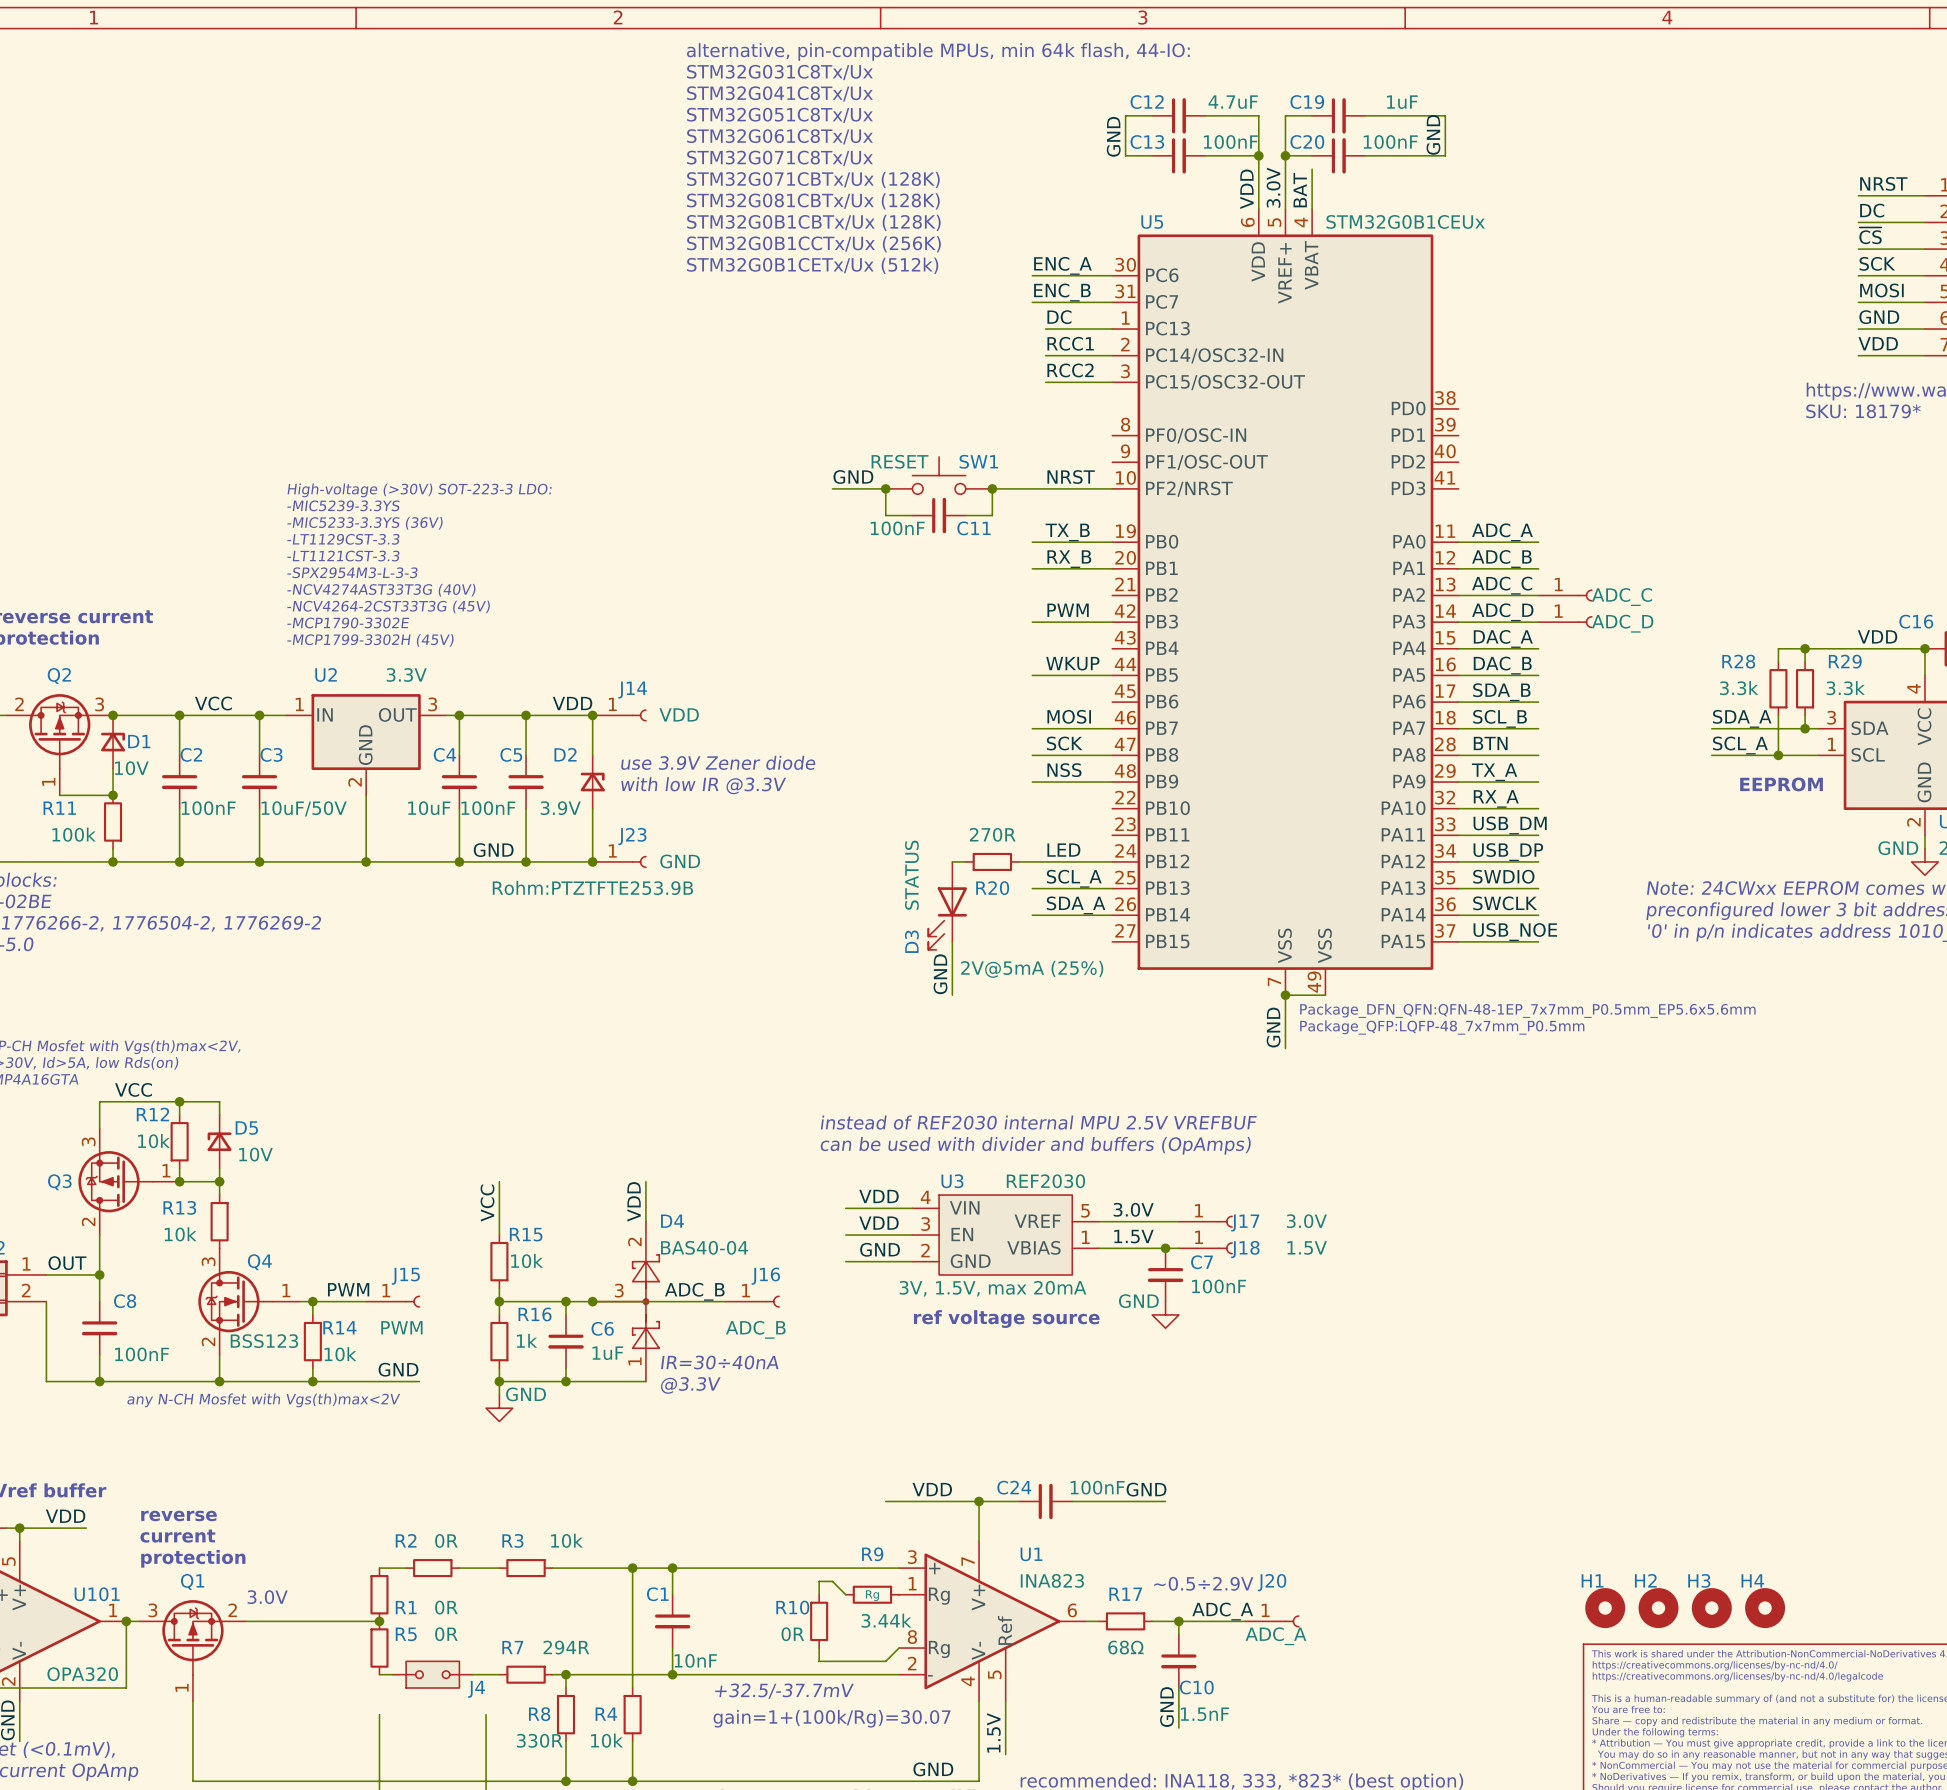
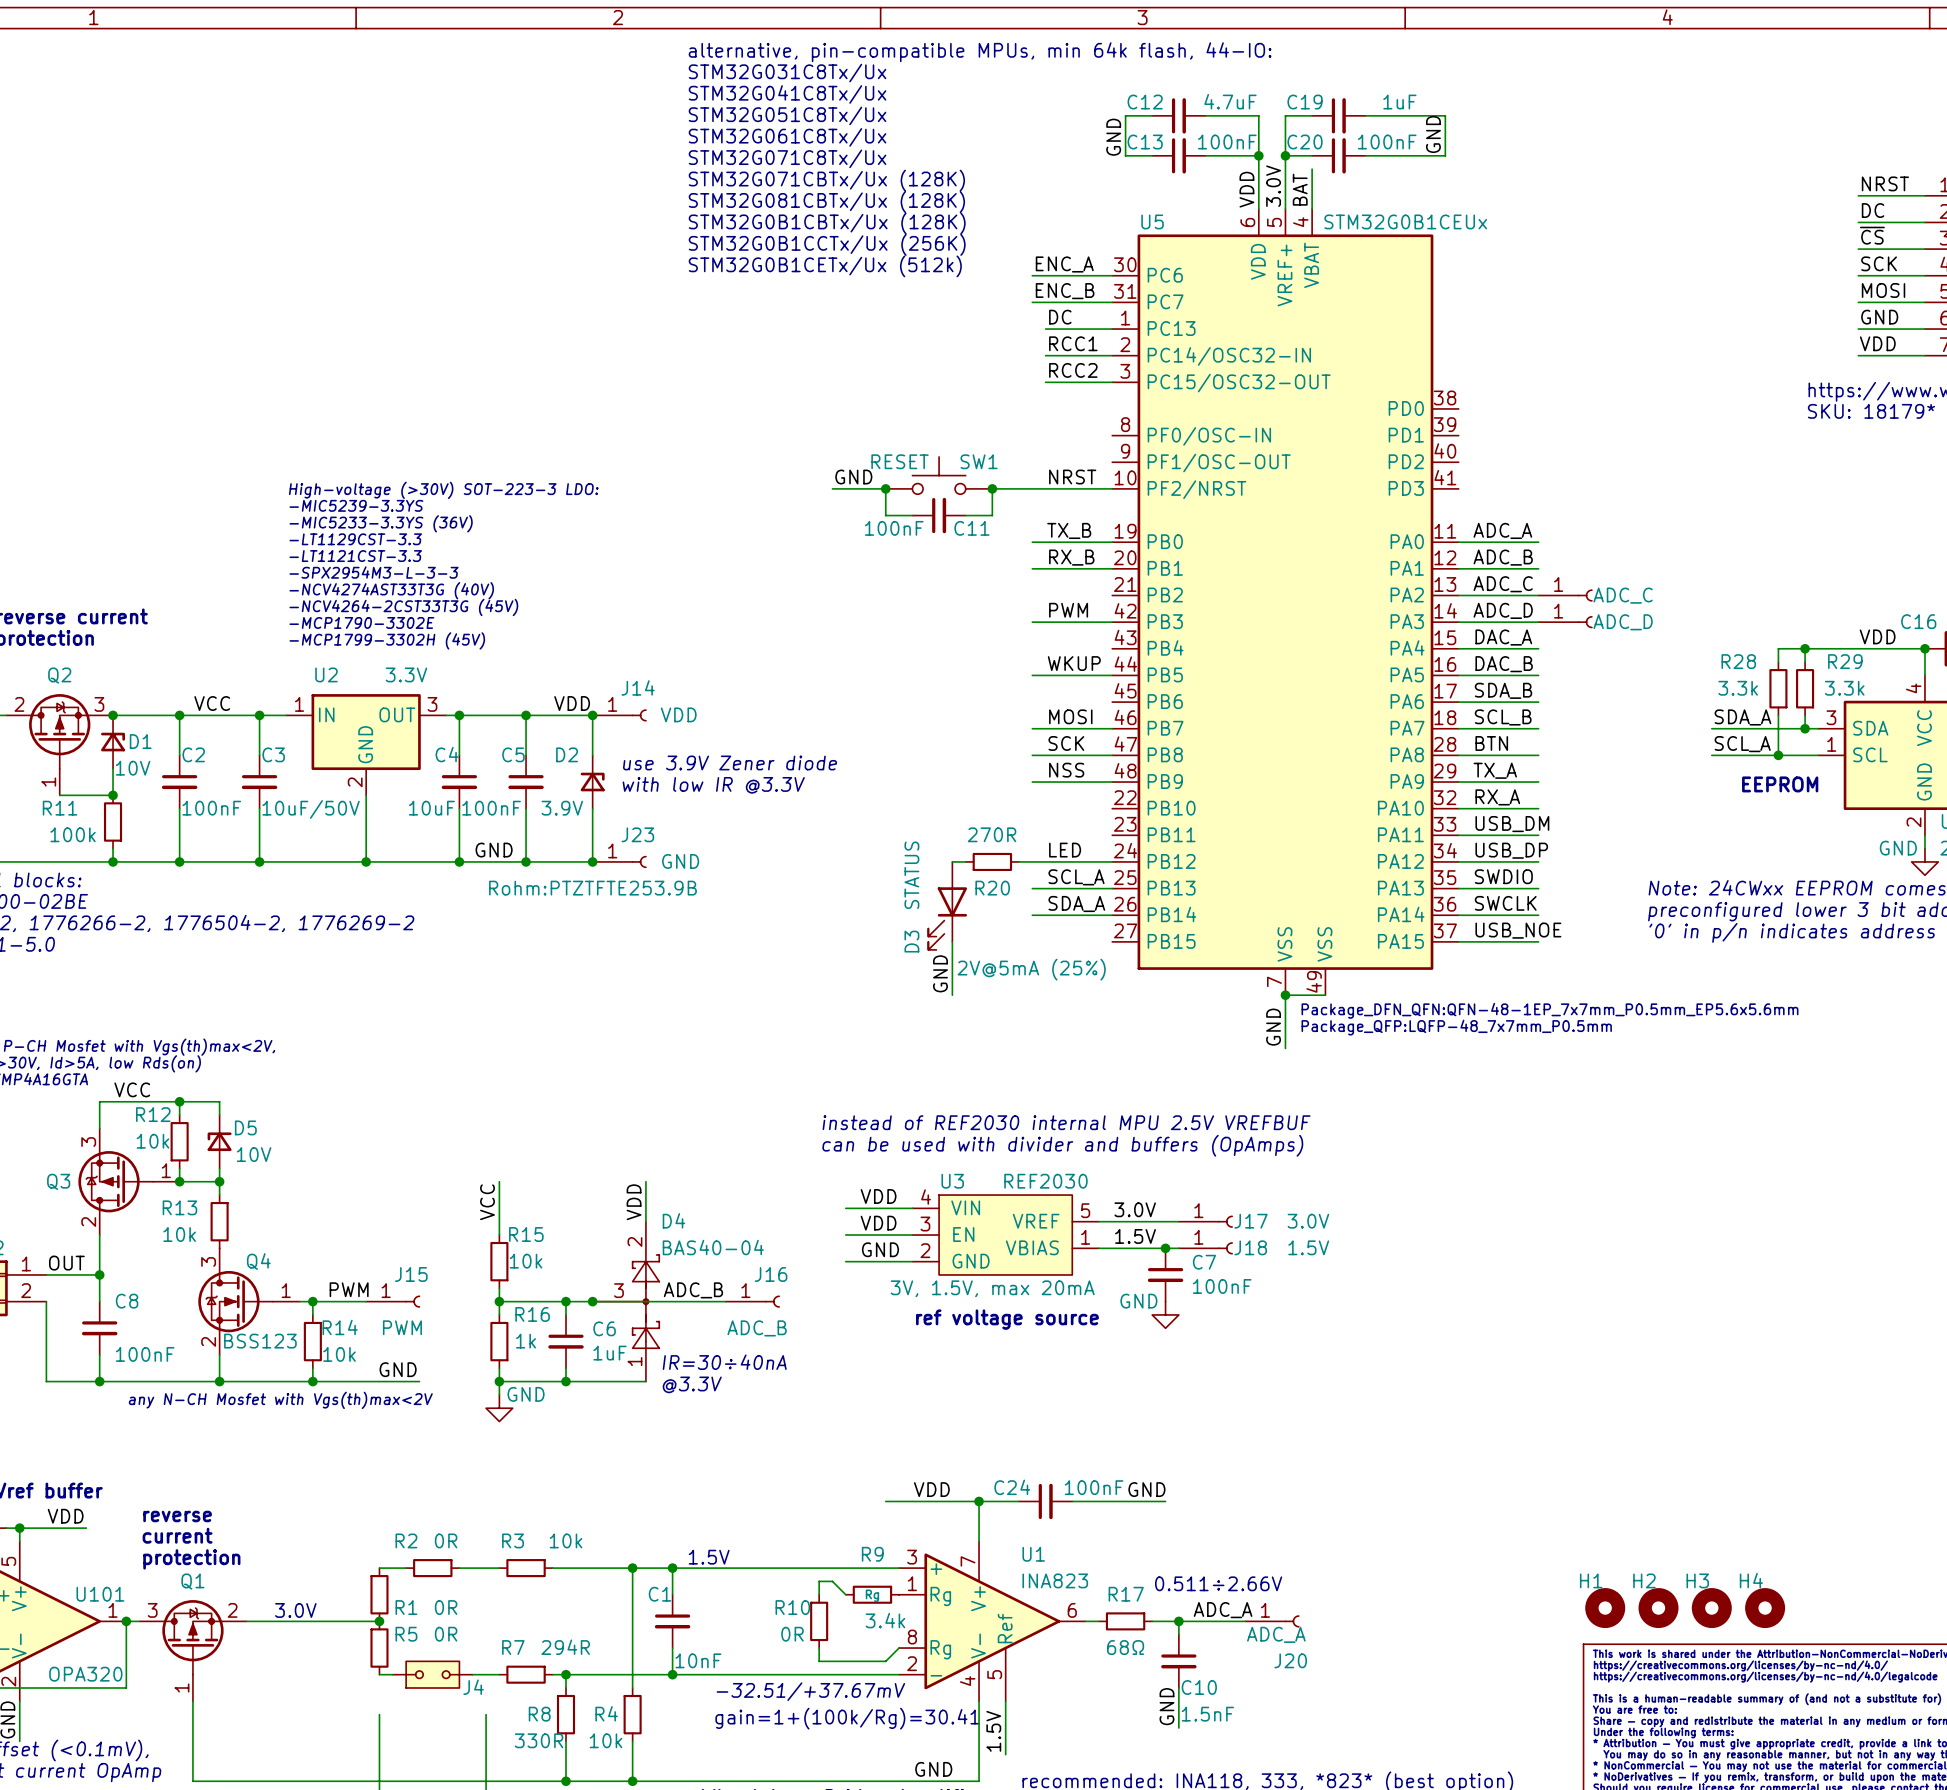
text: none -> 1.5V (709, 1557)
J20 name position: J20 (1272, 1582) -> J20 (1290, 1660)
text: ~0.5÷2.9V (1203, 1583) -> 0.511÷2.66V (1218, 1583)
text position: 3.0V (267, 1597) -> 3.0V (295, 1610)
R9 value: 3.44k (886, 1620) -> 3.4k (885, 1620)
text: +32.5/-37.7mV (784, 1691) -> -32.51/+37.67mV (810, 1691)
text: gain=1+(100k/Rg)=30.07 (832, 1718) -> gain=1+(100k/Rg)=30.41 (847, 1718)

